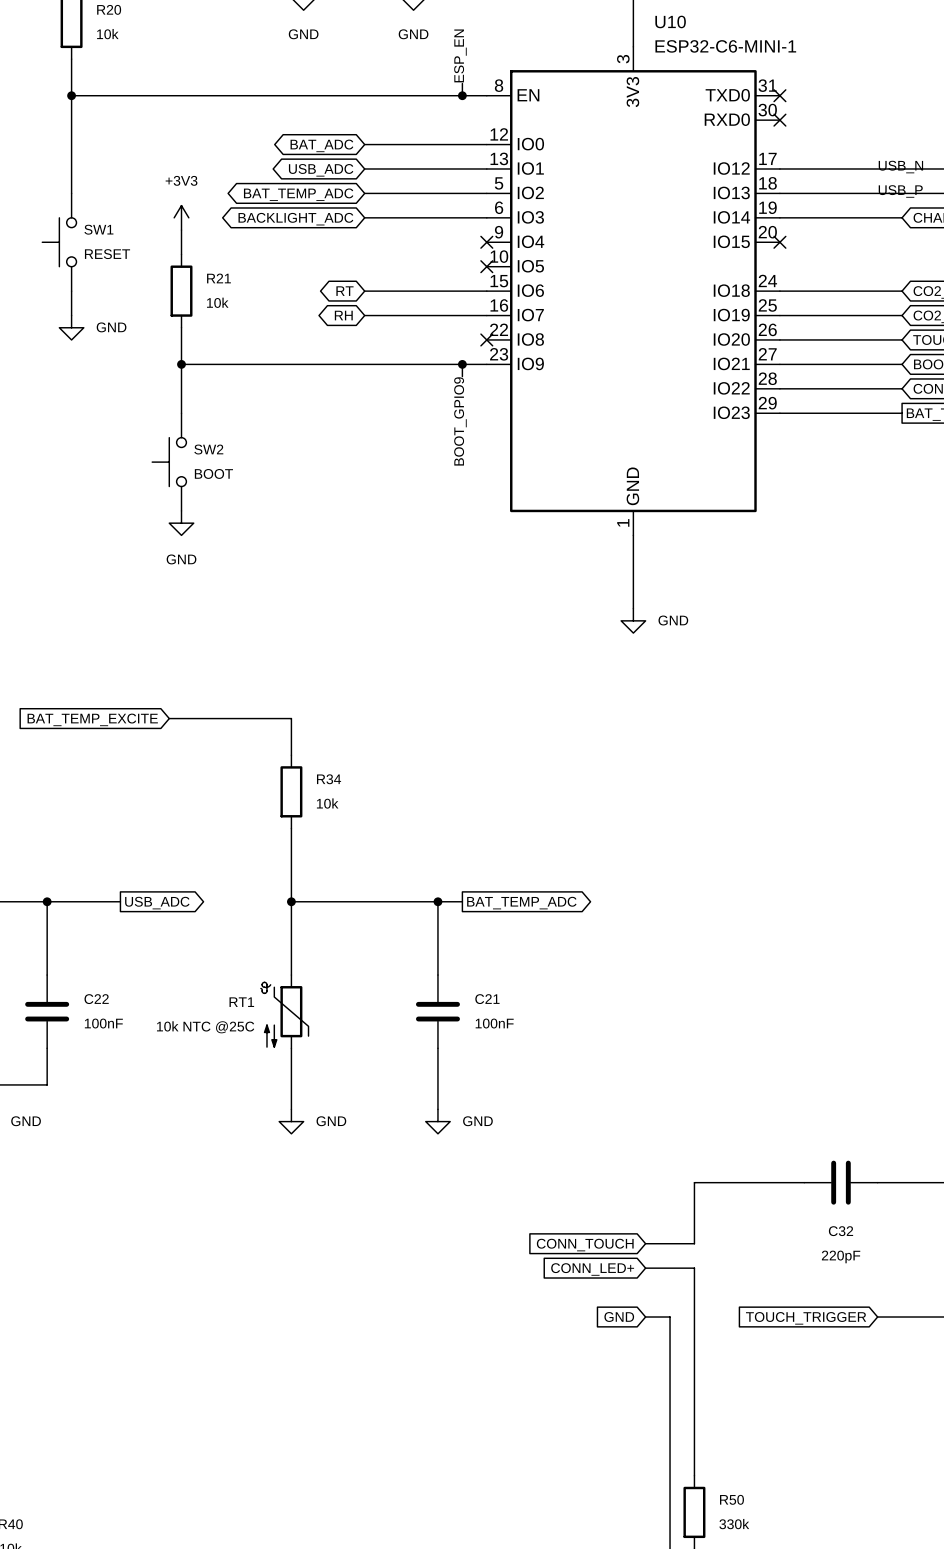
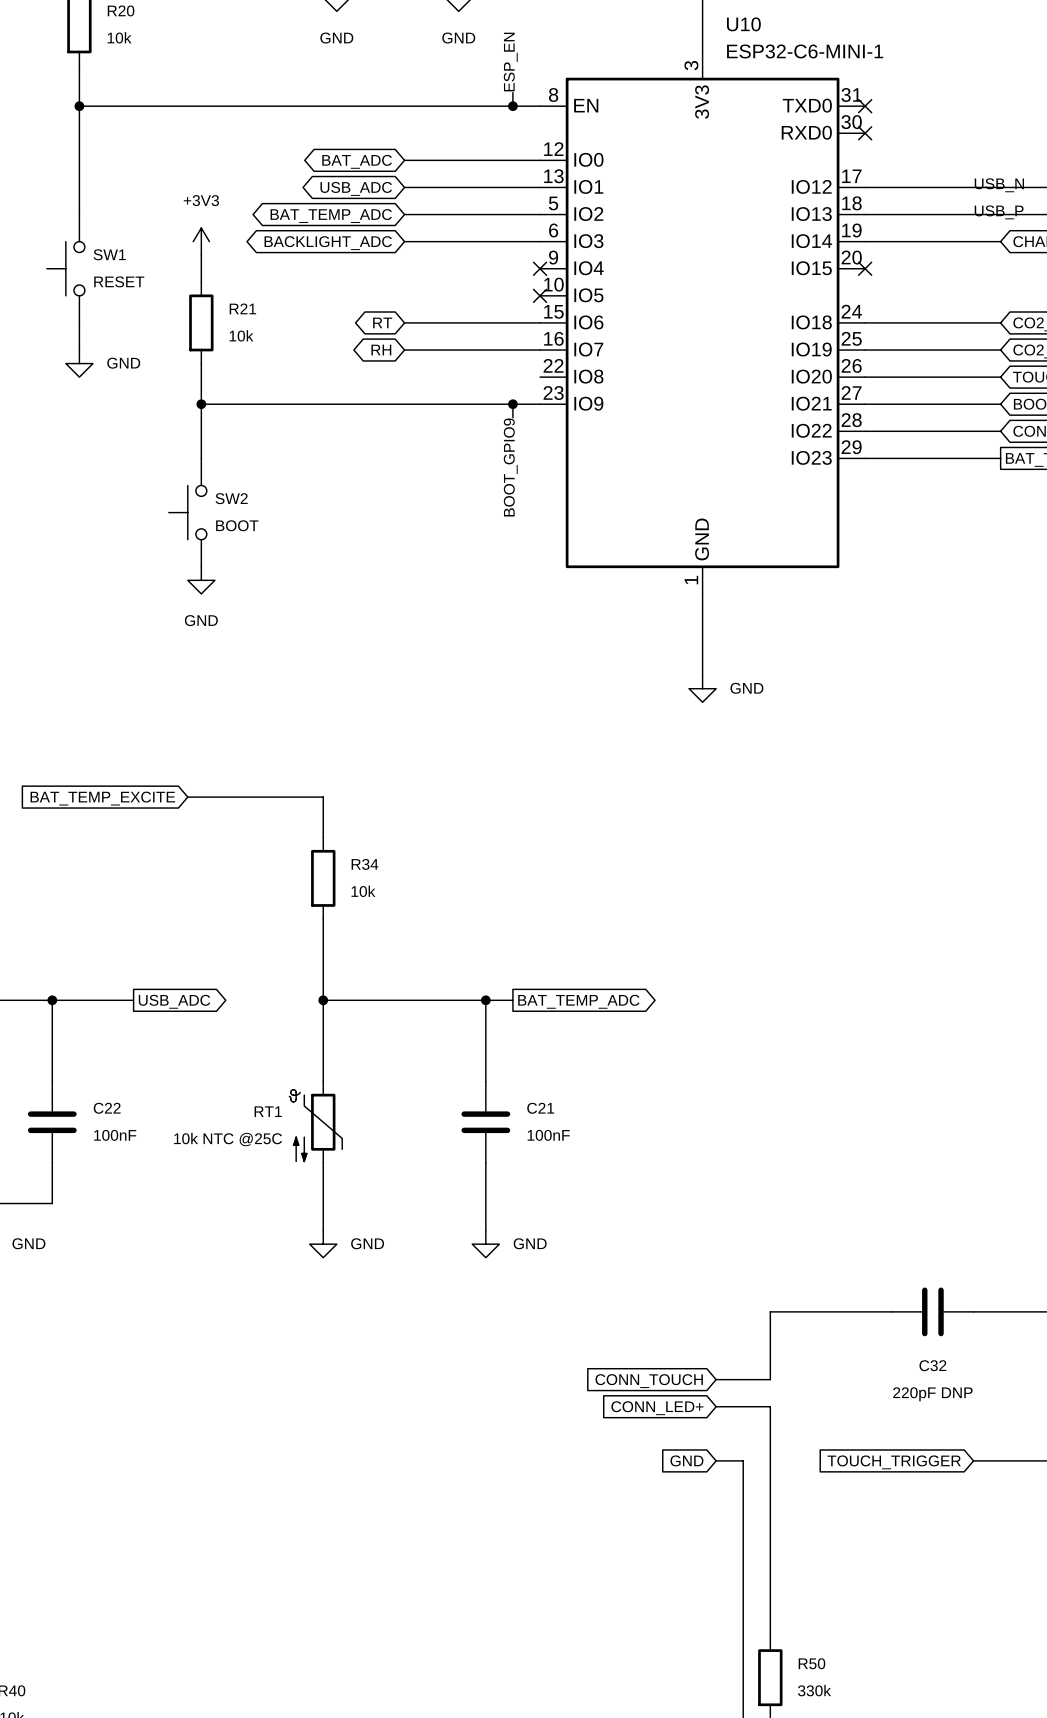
no-connect mark: (486, 339) -> none
C32 value: 220pF (841, 1256) -> 220pF DNP (932, 1394)

